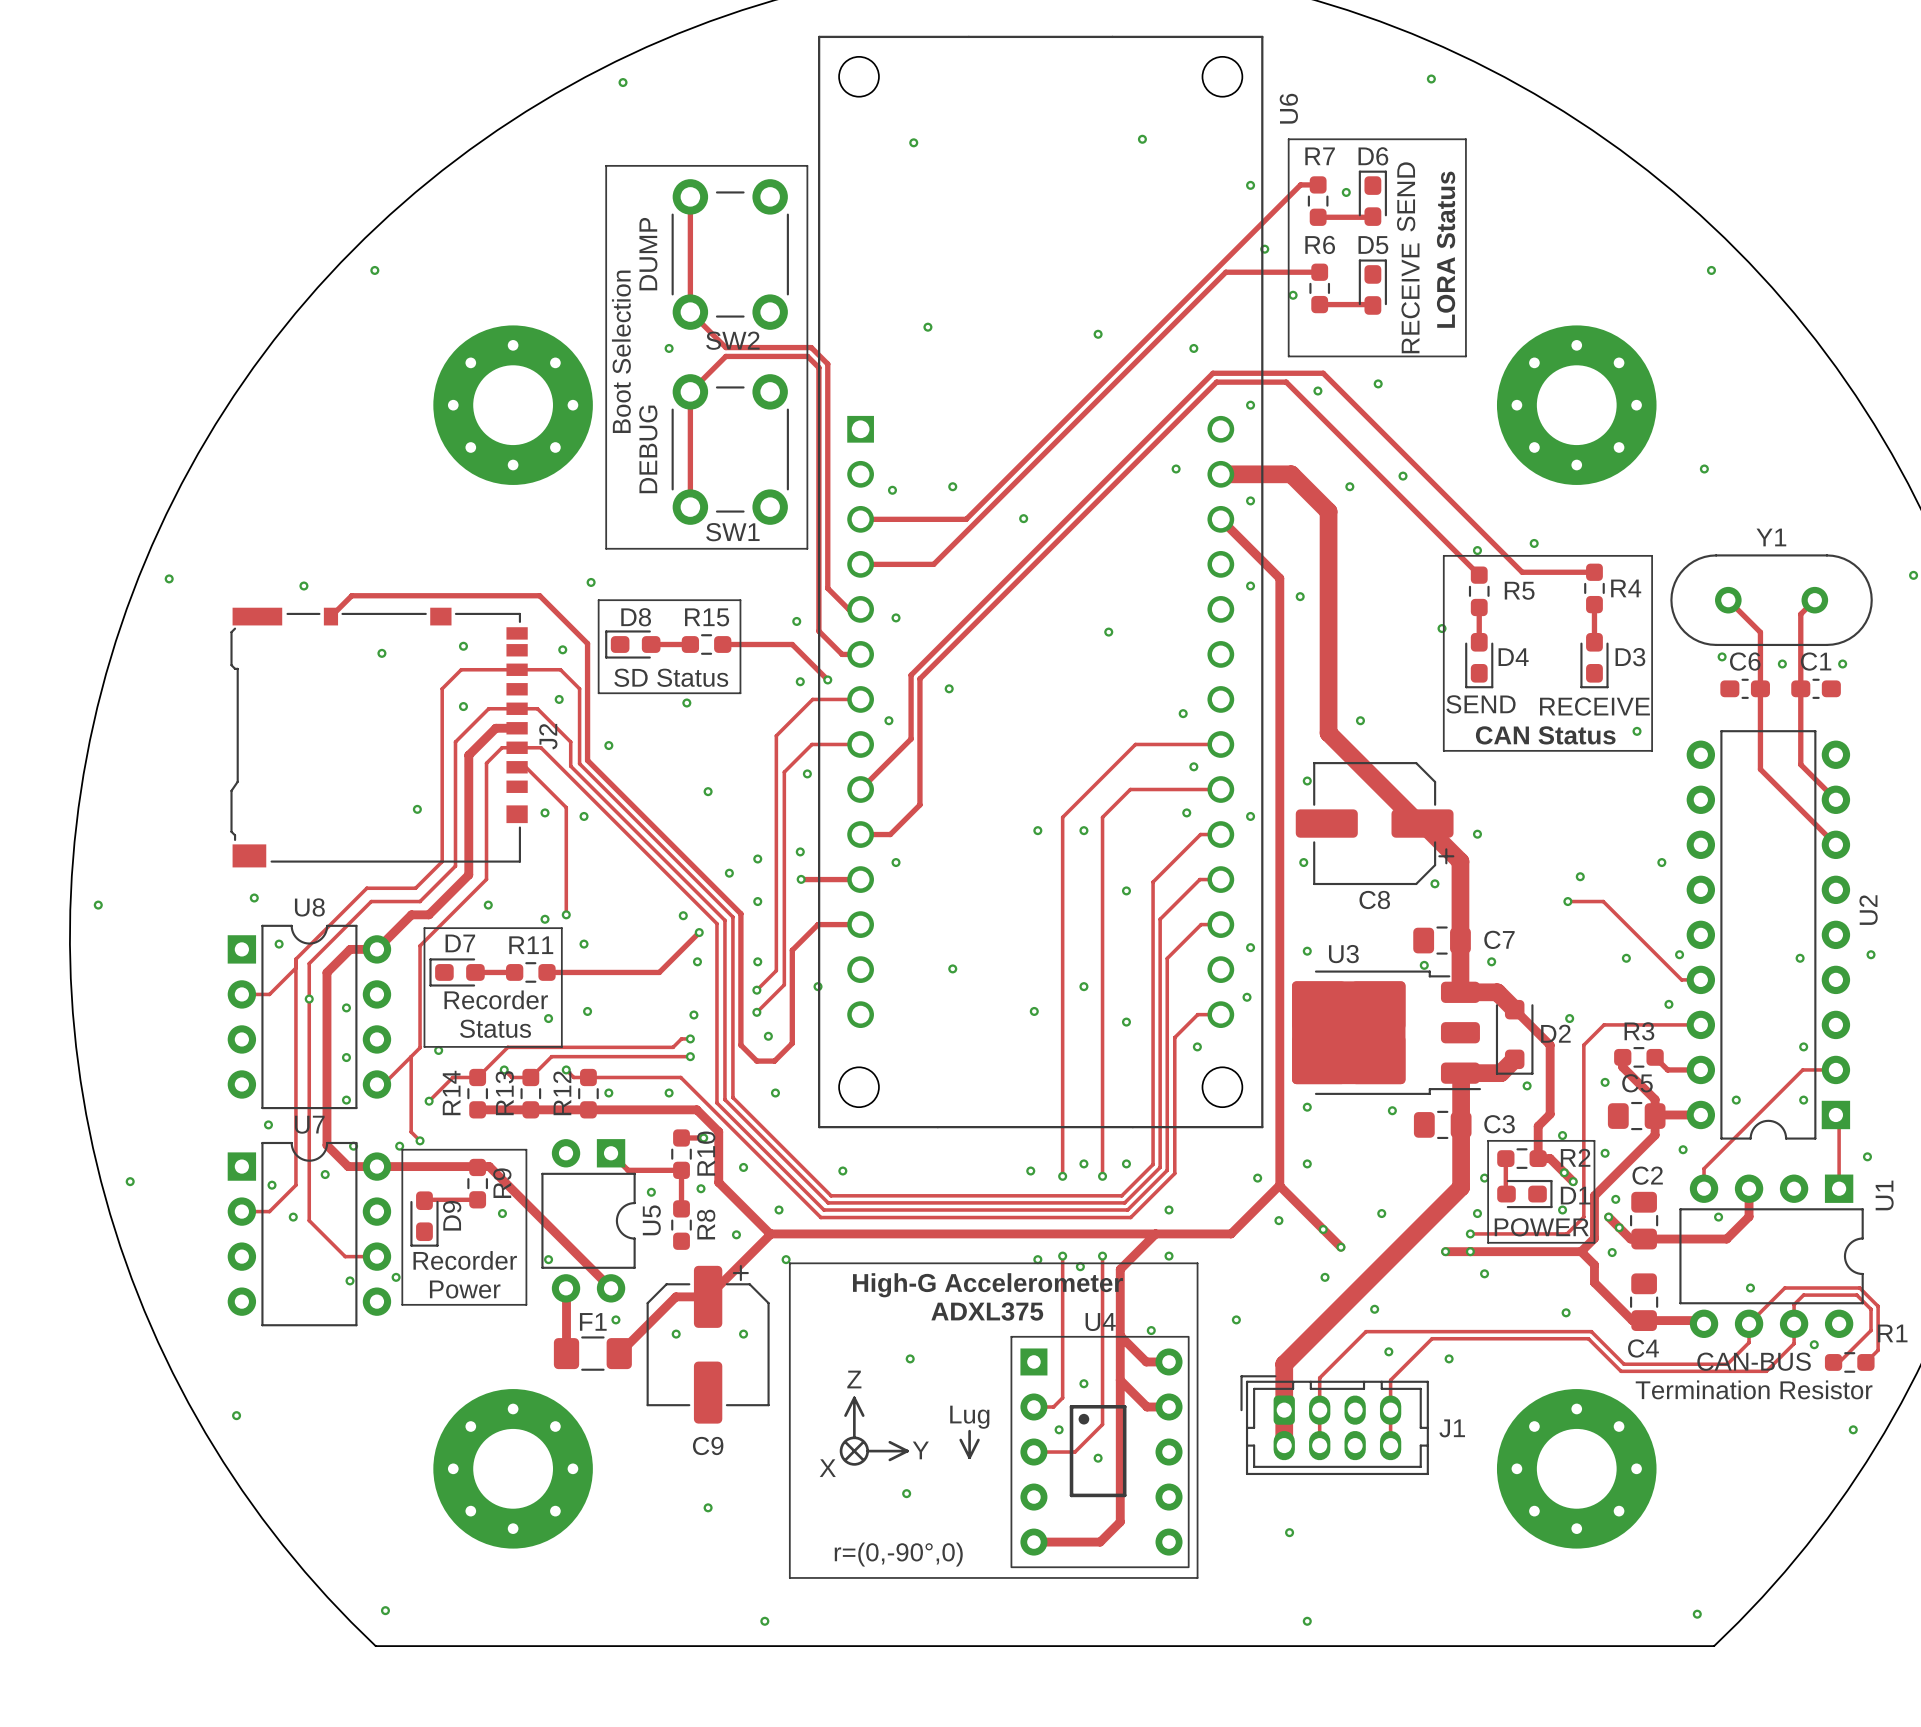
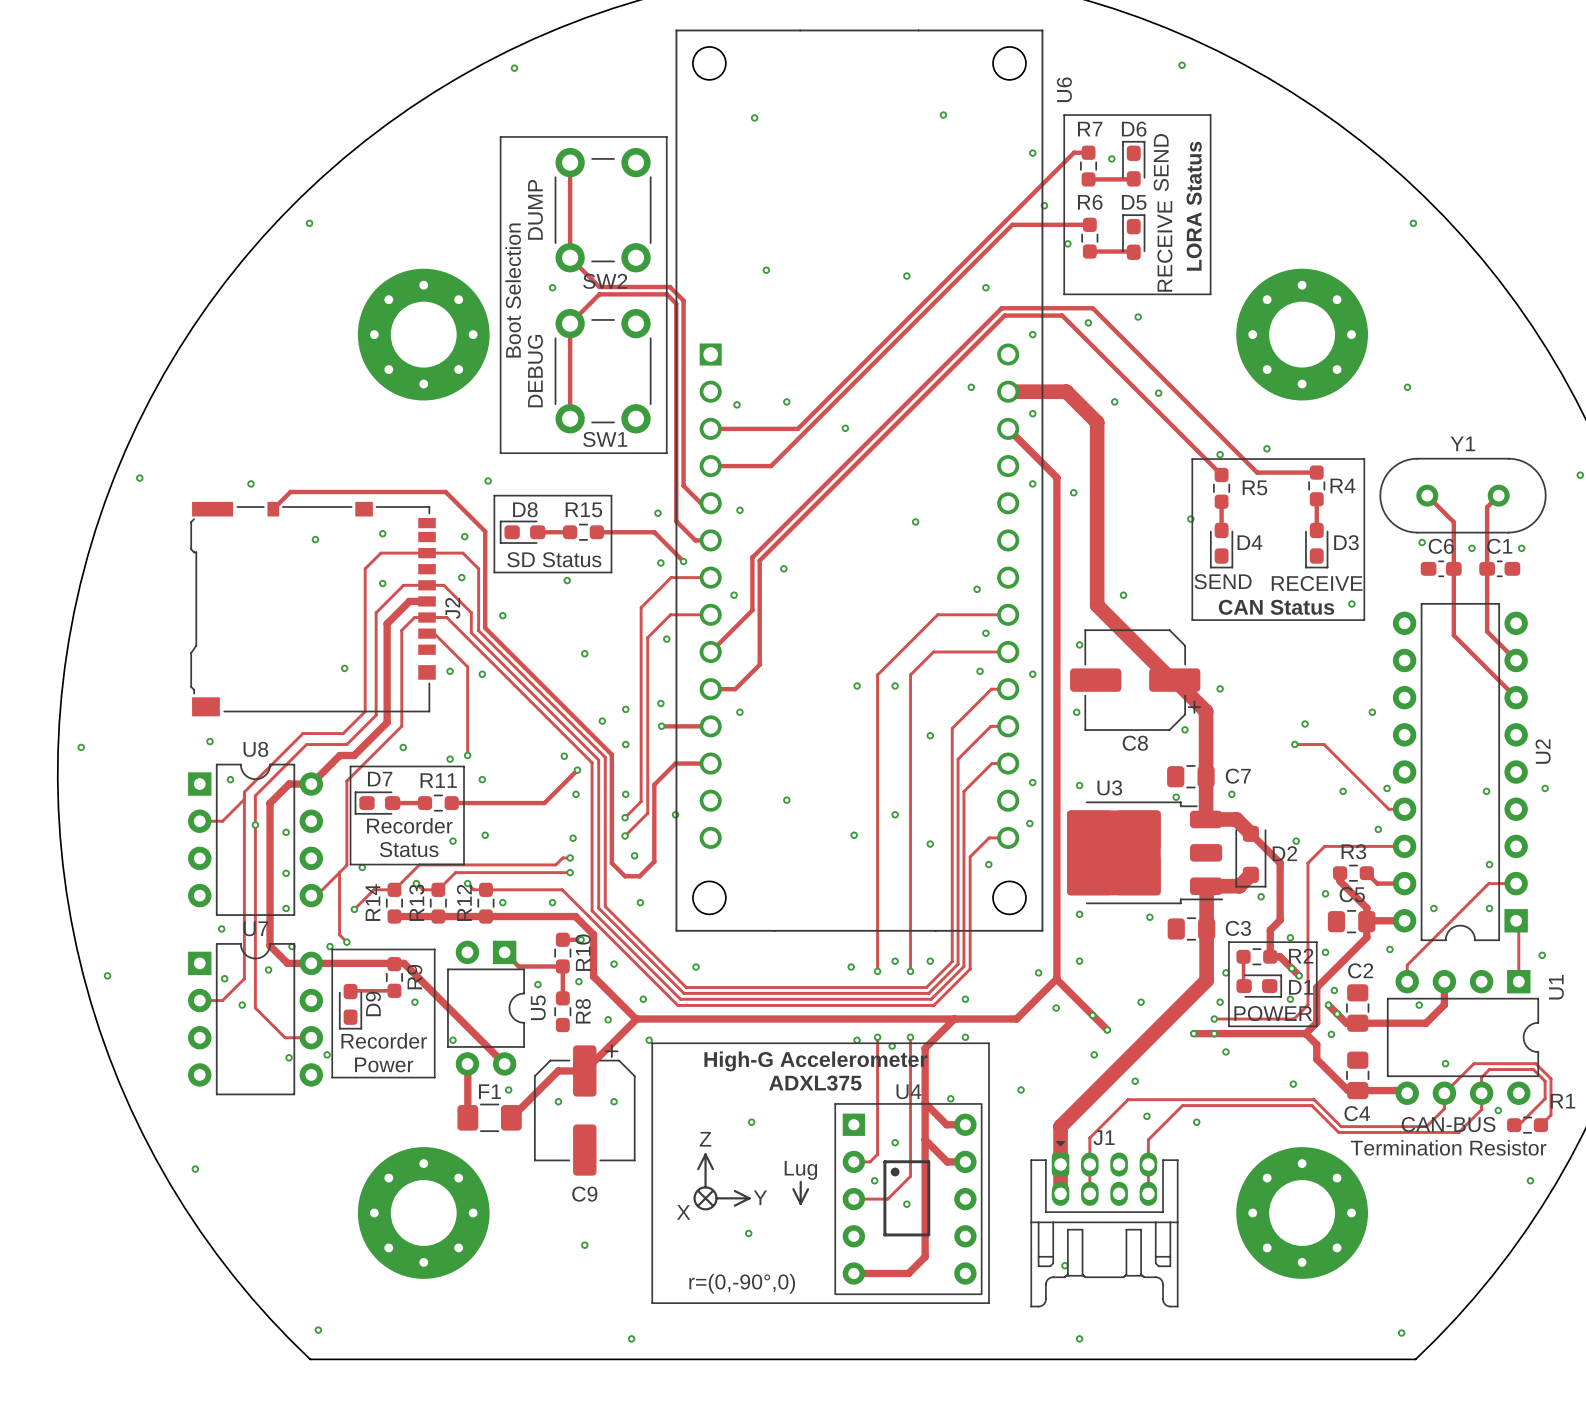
J1 footprint: [1240, 1375, 1429, 1476] -> [1030, 1141, 1179, 1308]
J1 name position: J1 (1452, 1428) -> J1 (1104, 1137)

